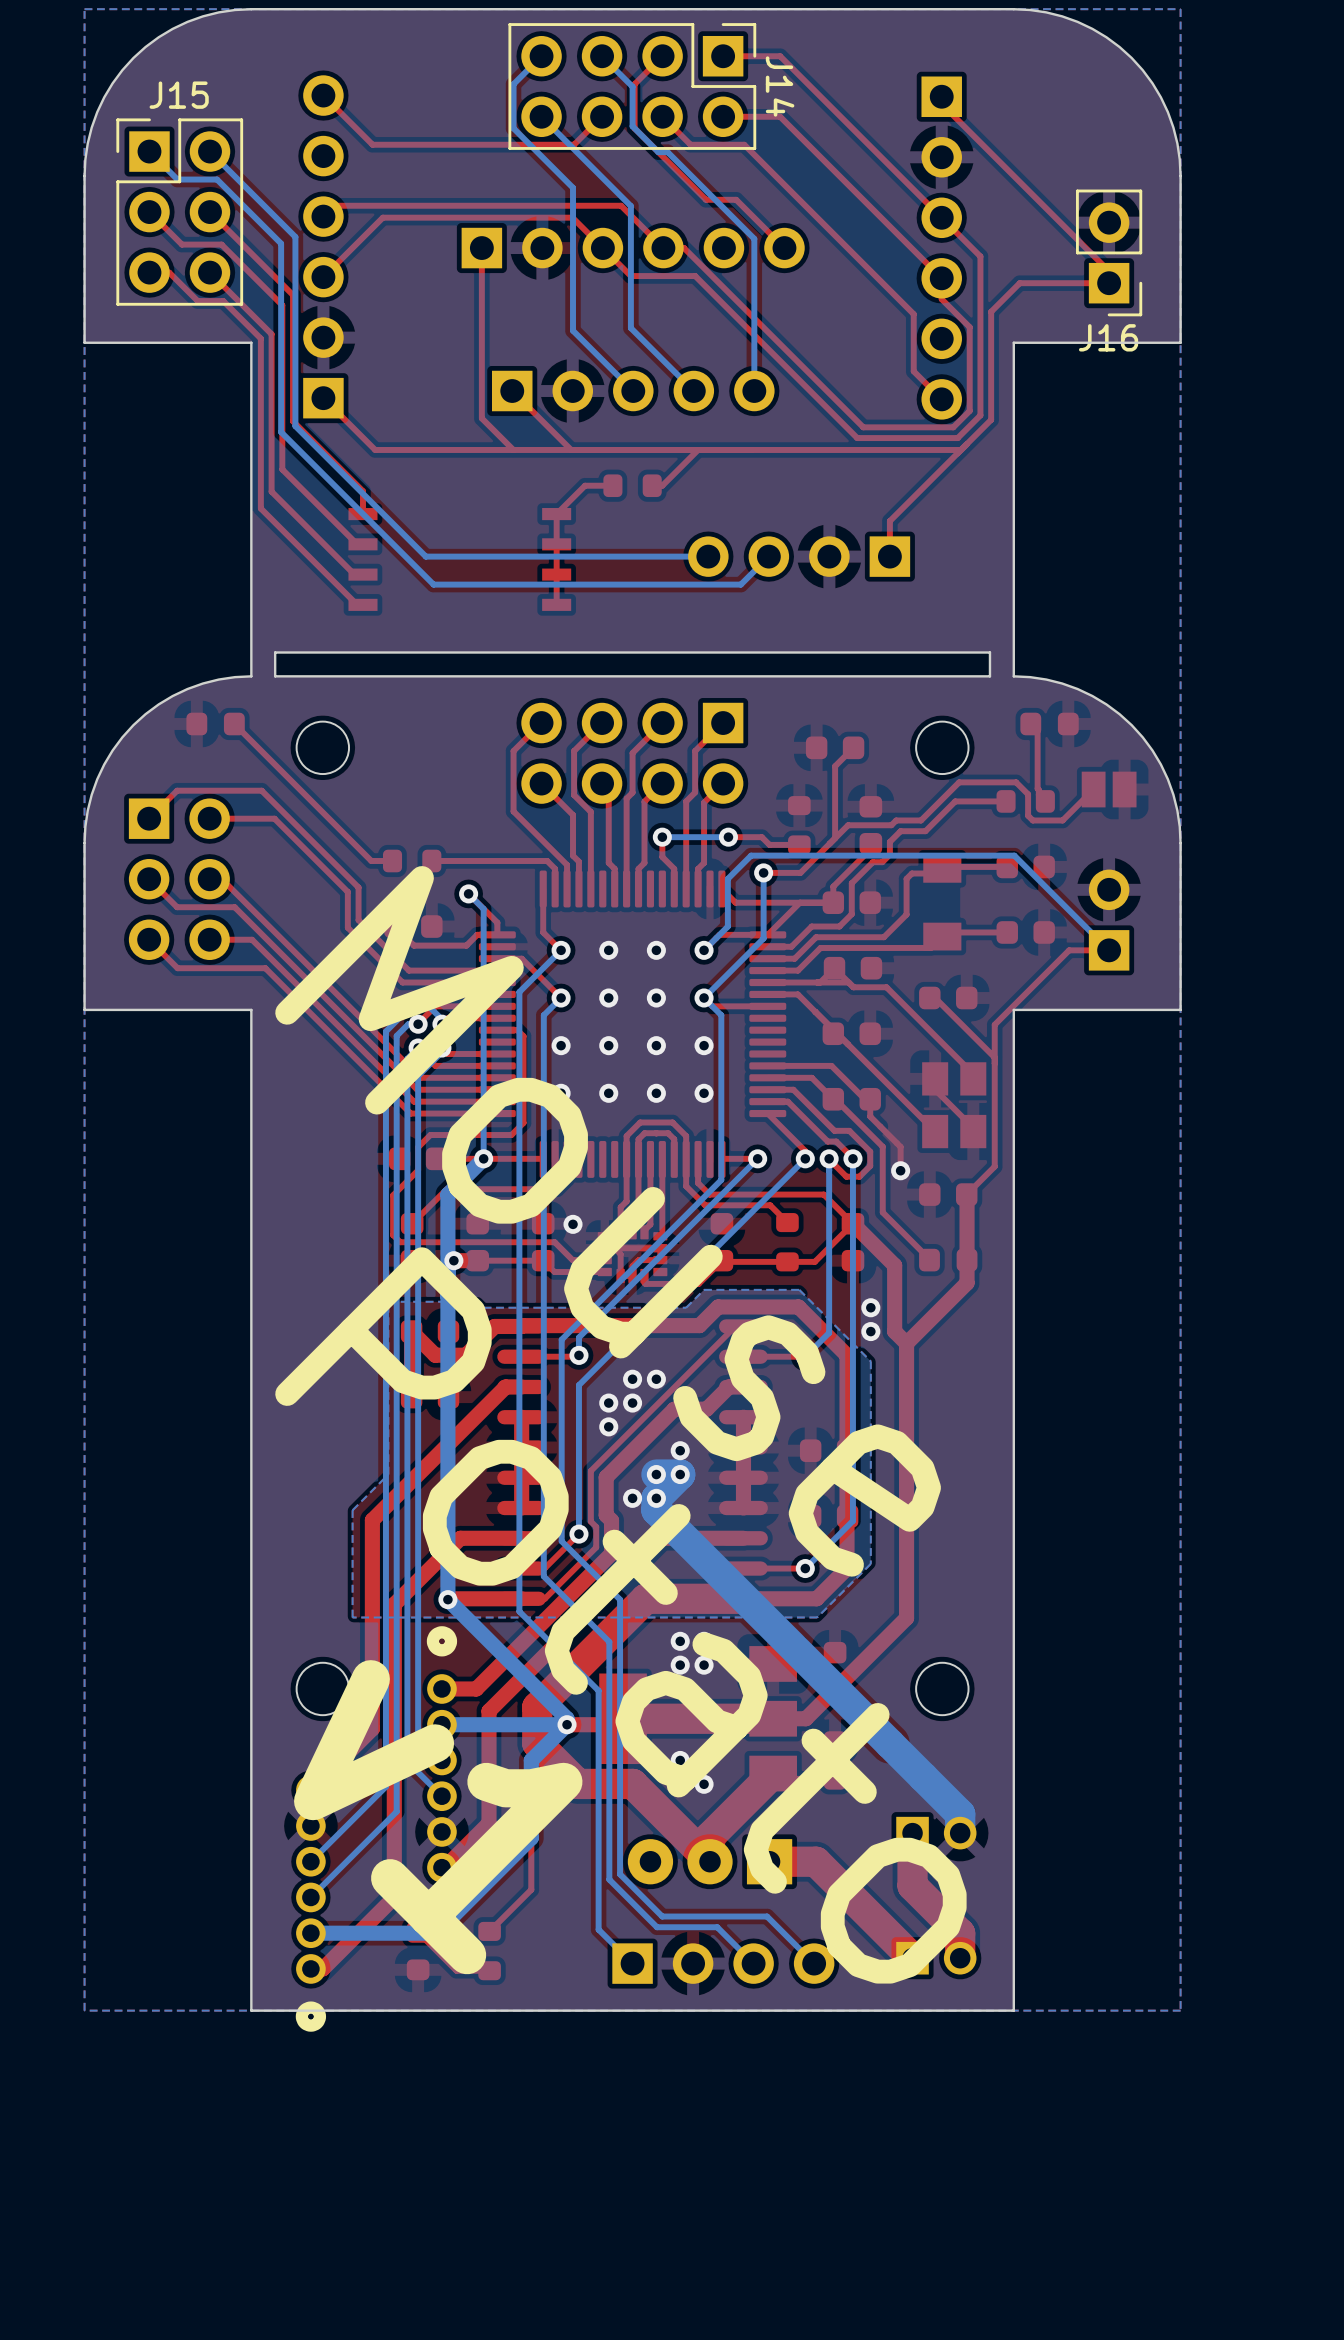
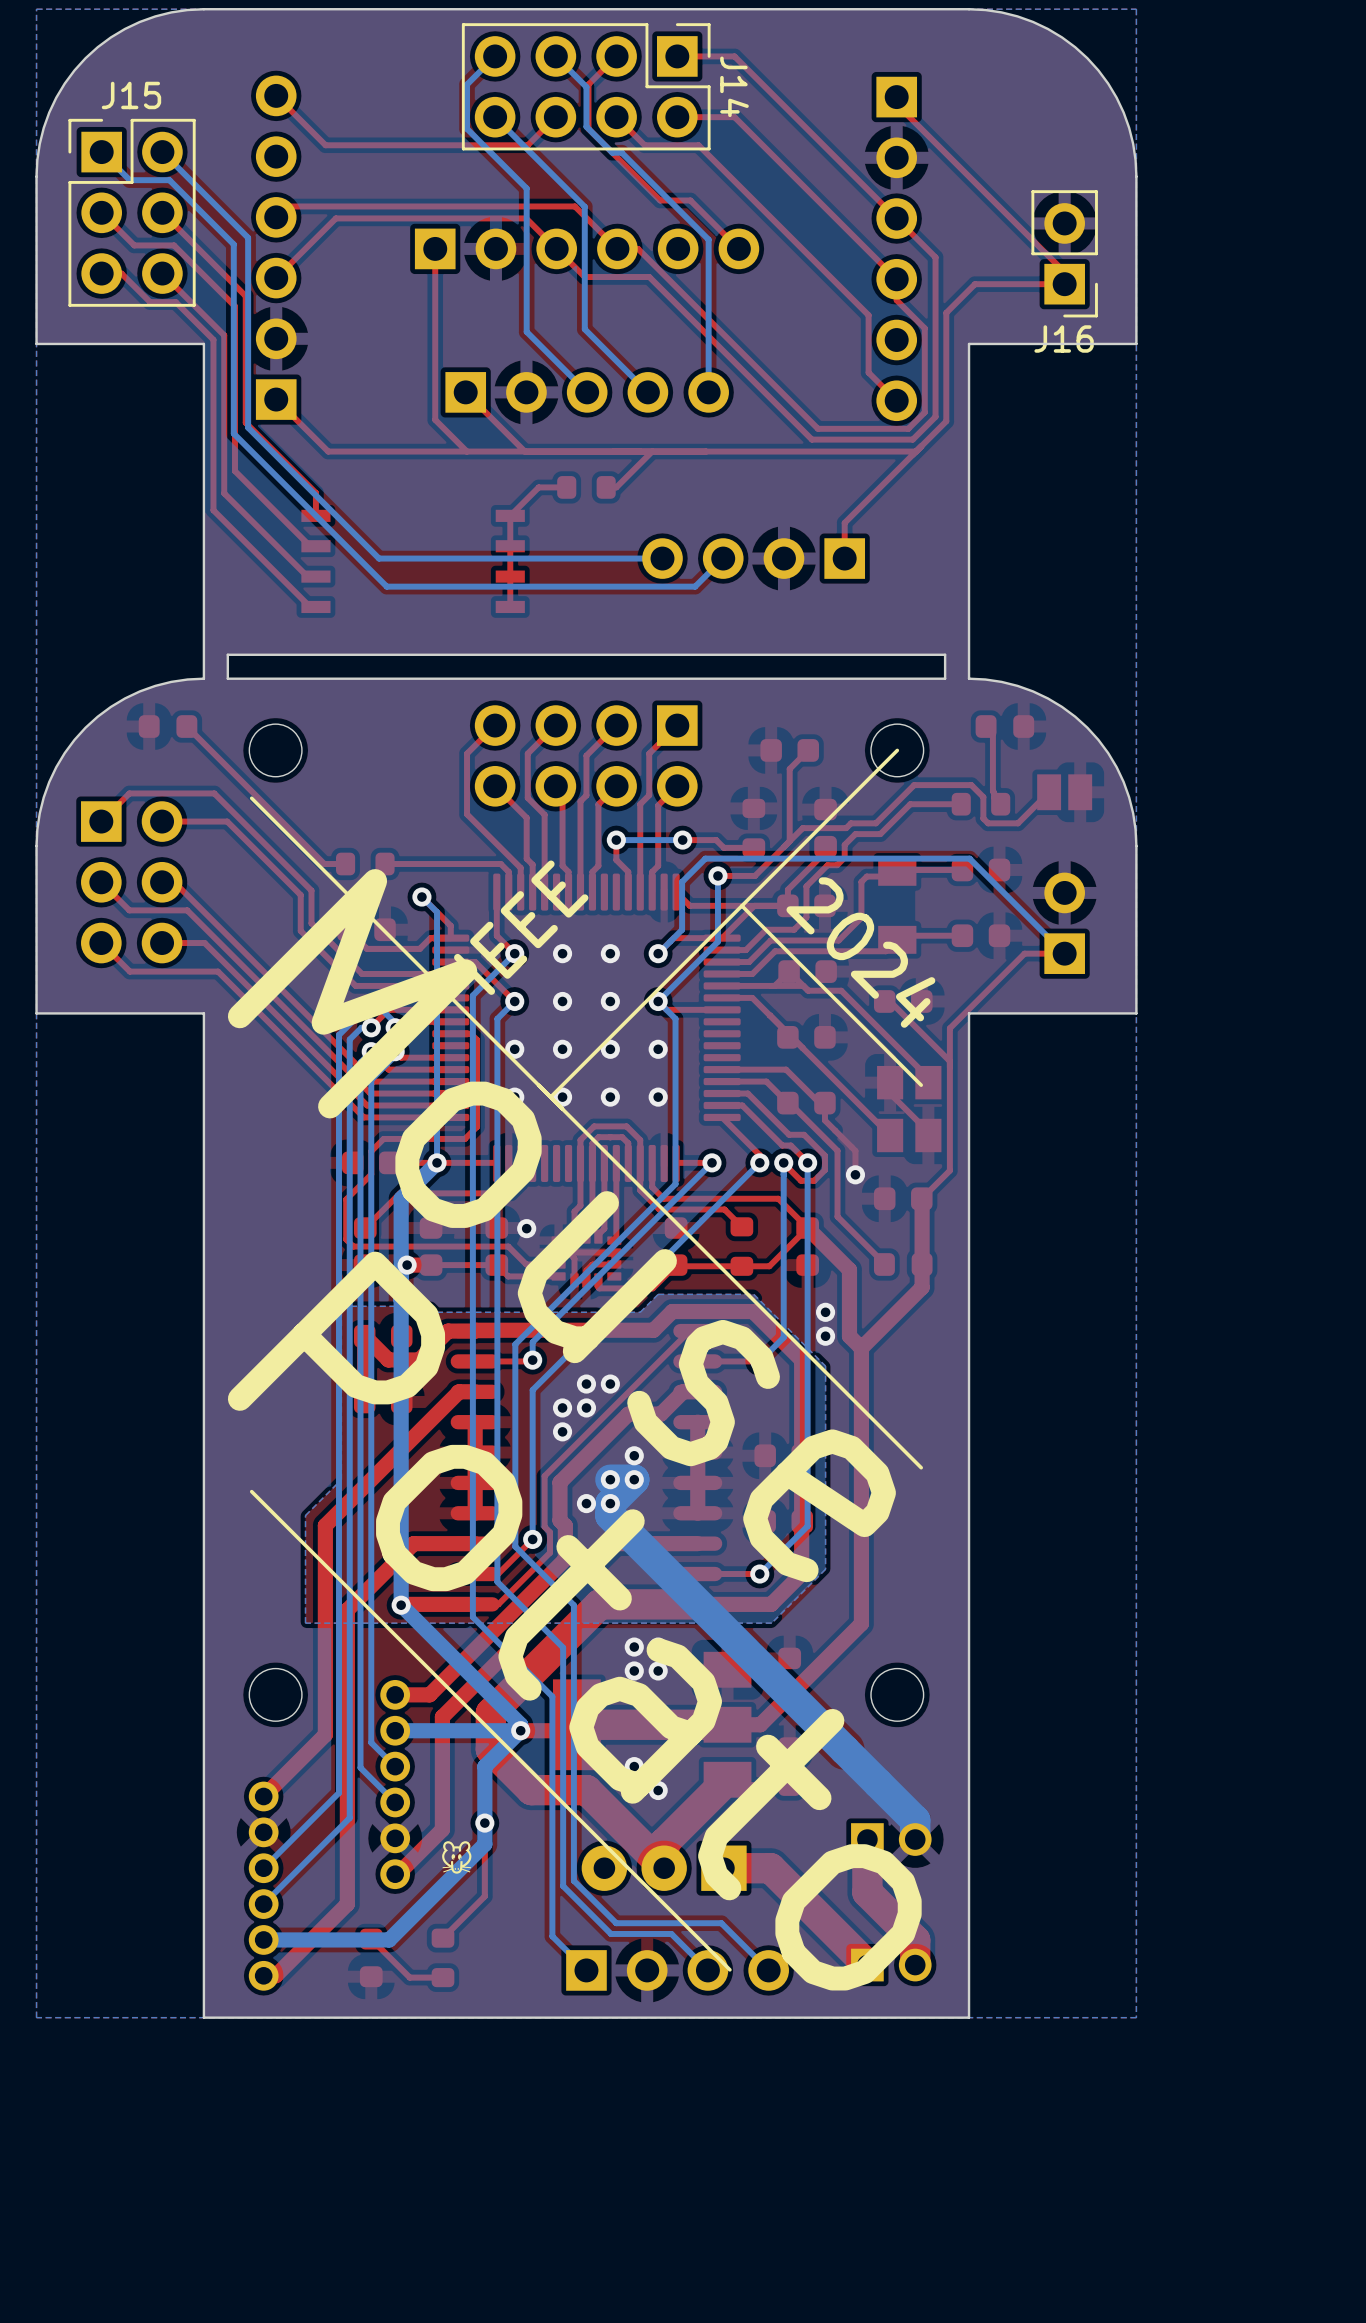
line: none -> (897, 750) (550, 1097)
line: none -> (251, 798) (921, 1467)
line: none -> (741, 905) (921, 1085)
text: none -> IEEE (521, 927)
text: none -> 2024 (860, 952)
line: none -> (251, 1491) (729, 1969)
part: (441, 1754) -> none
part: none -> (395, 1784)
text: v1 (438, 1817) -> none
text: none -> 🐭 (456, 1857)
part: none -> (263, 1886)
part: (310, 1903) -> none

